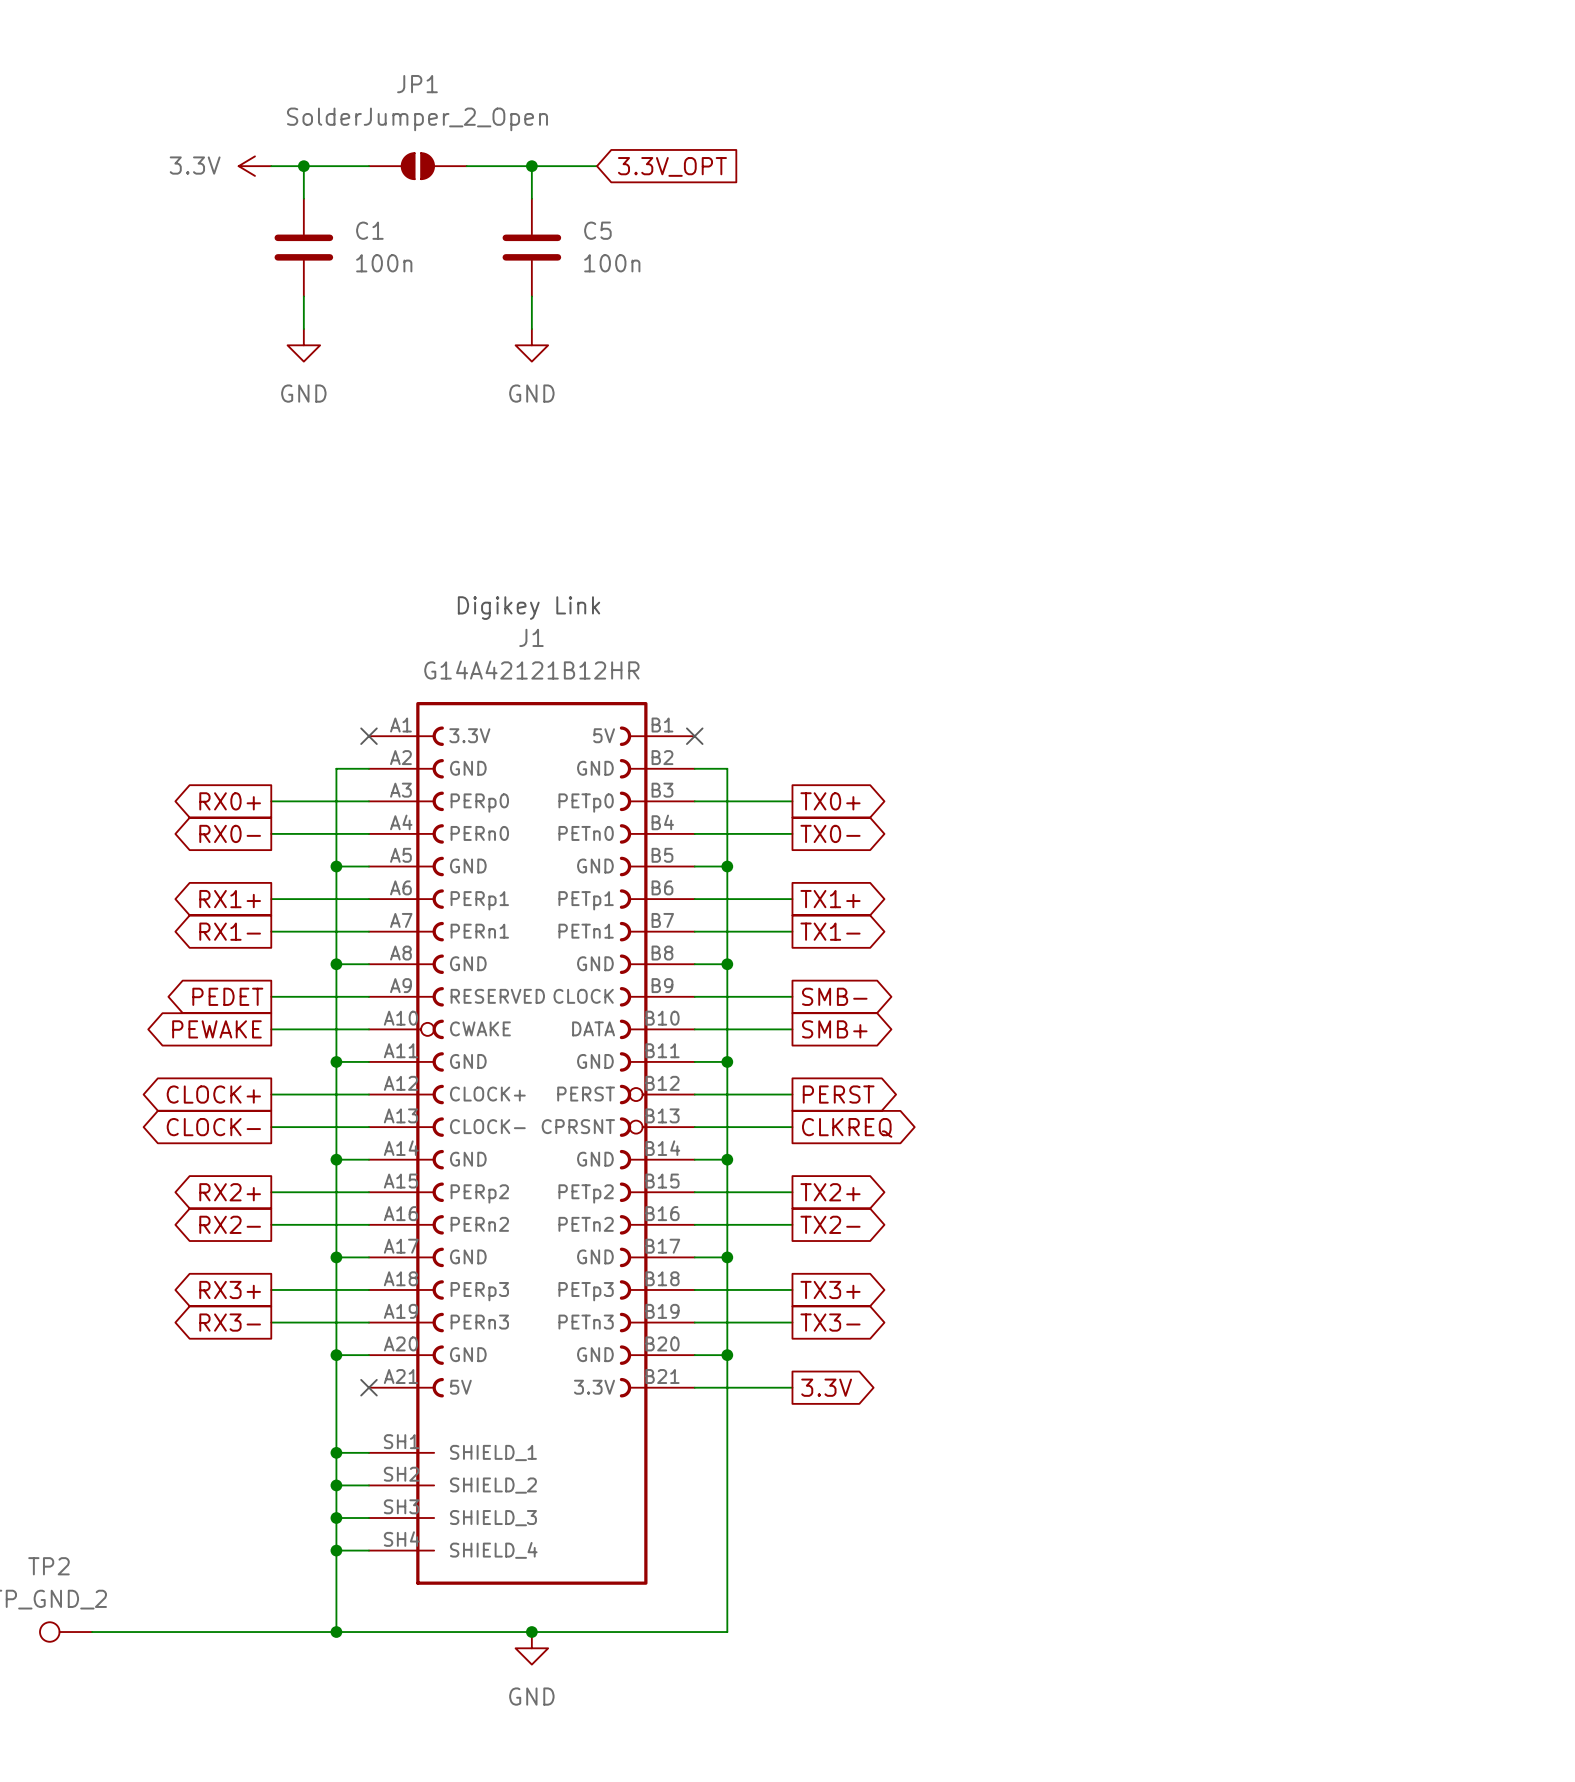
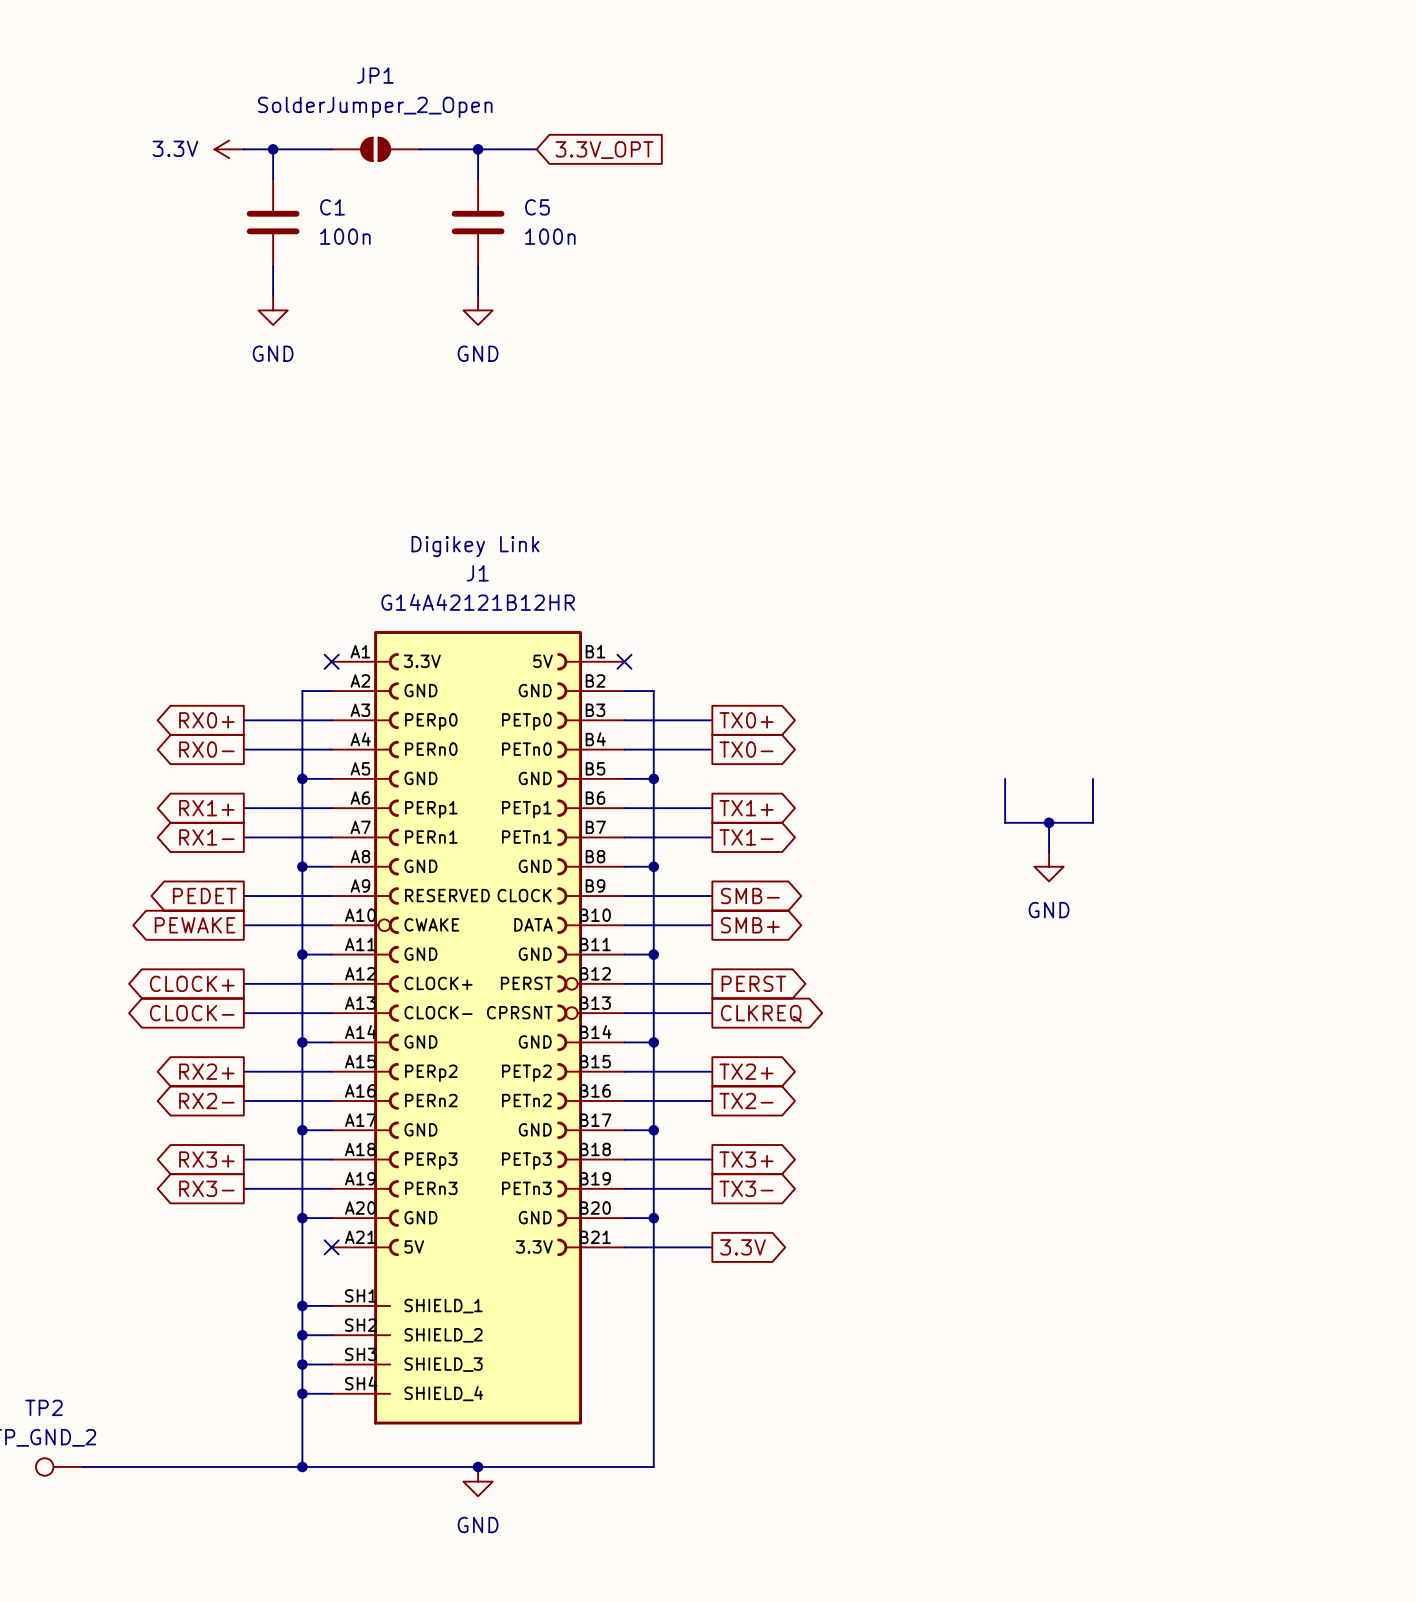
wire: none -> (1005, 778) (1005, 822) (1092, 822) (1092, 778)
wire: none -> (1049, 822) (1049, 852)
junction: none -> (1049, 822)
power symbol: none -> GND (1049, 866)

